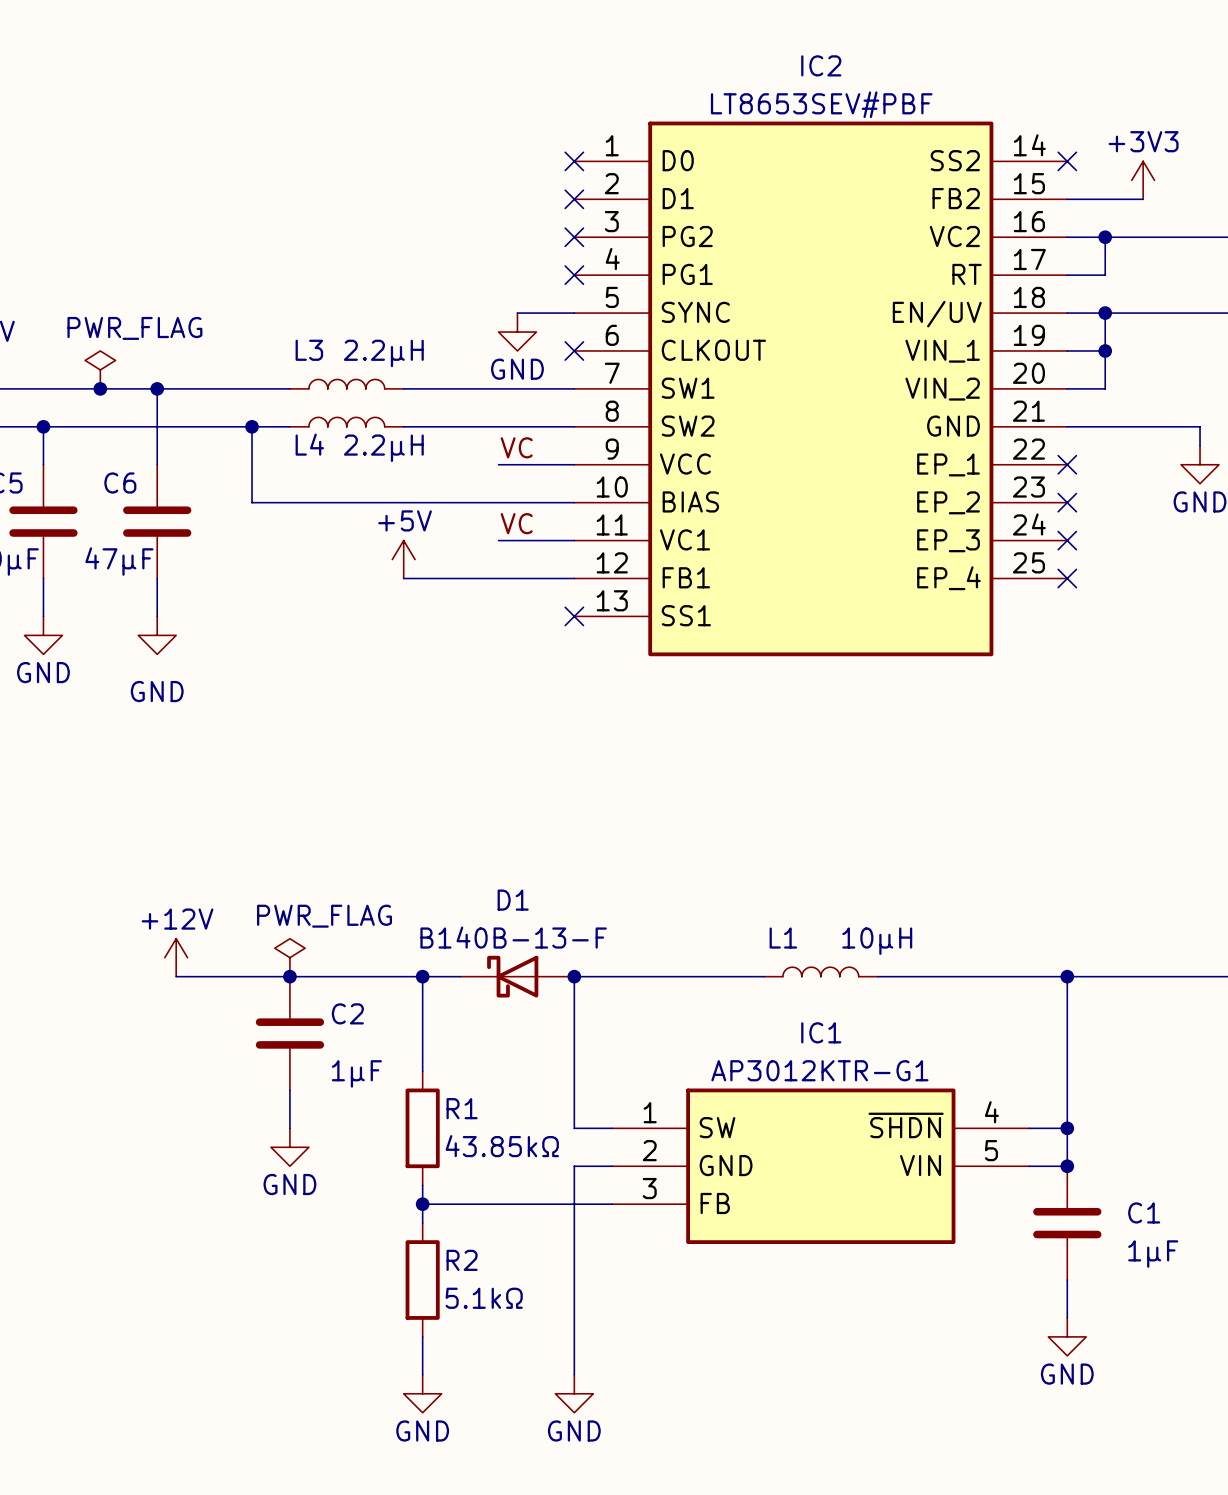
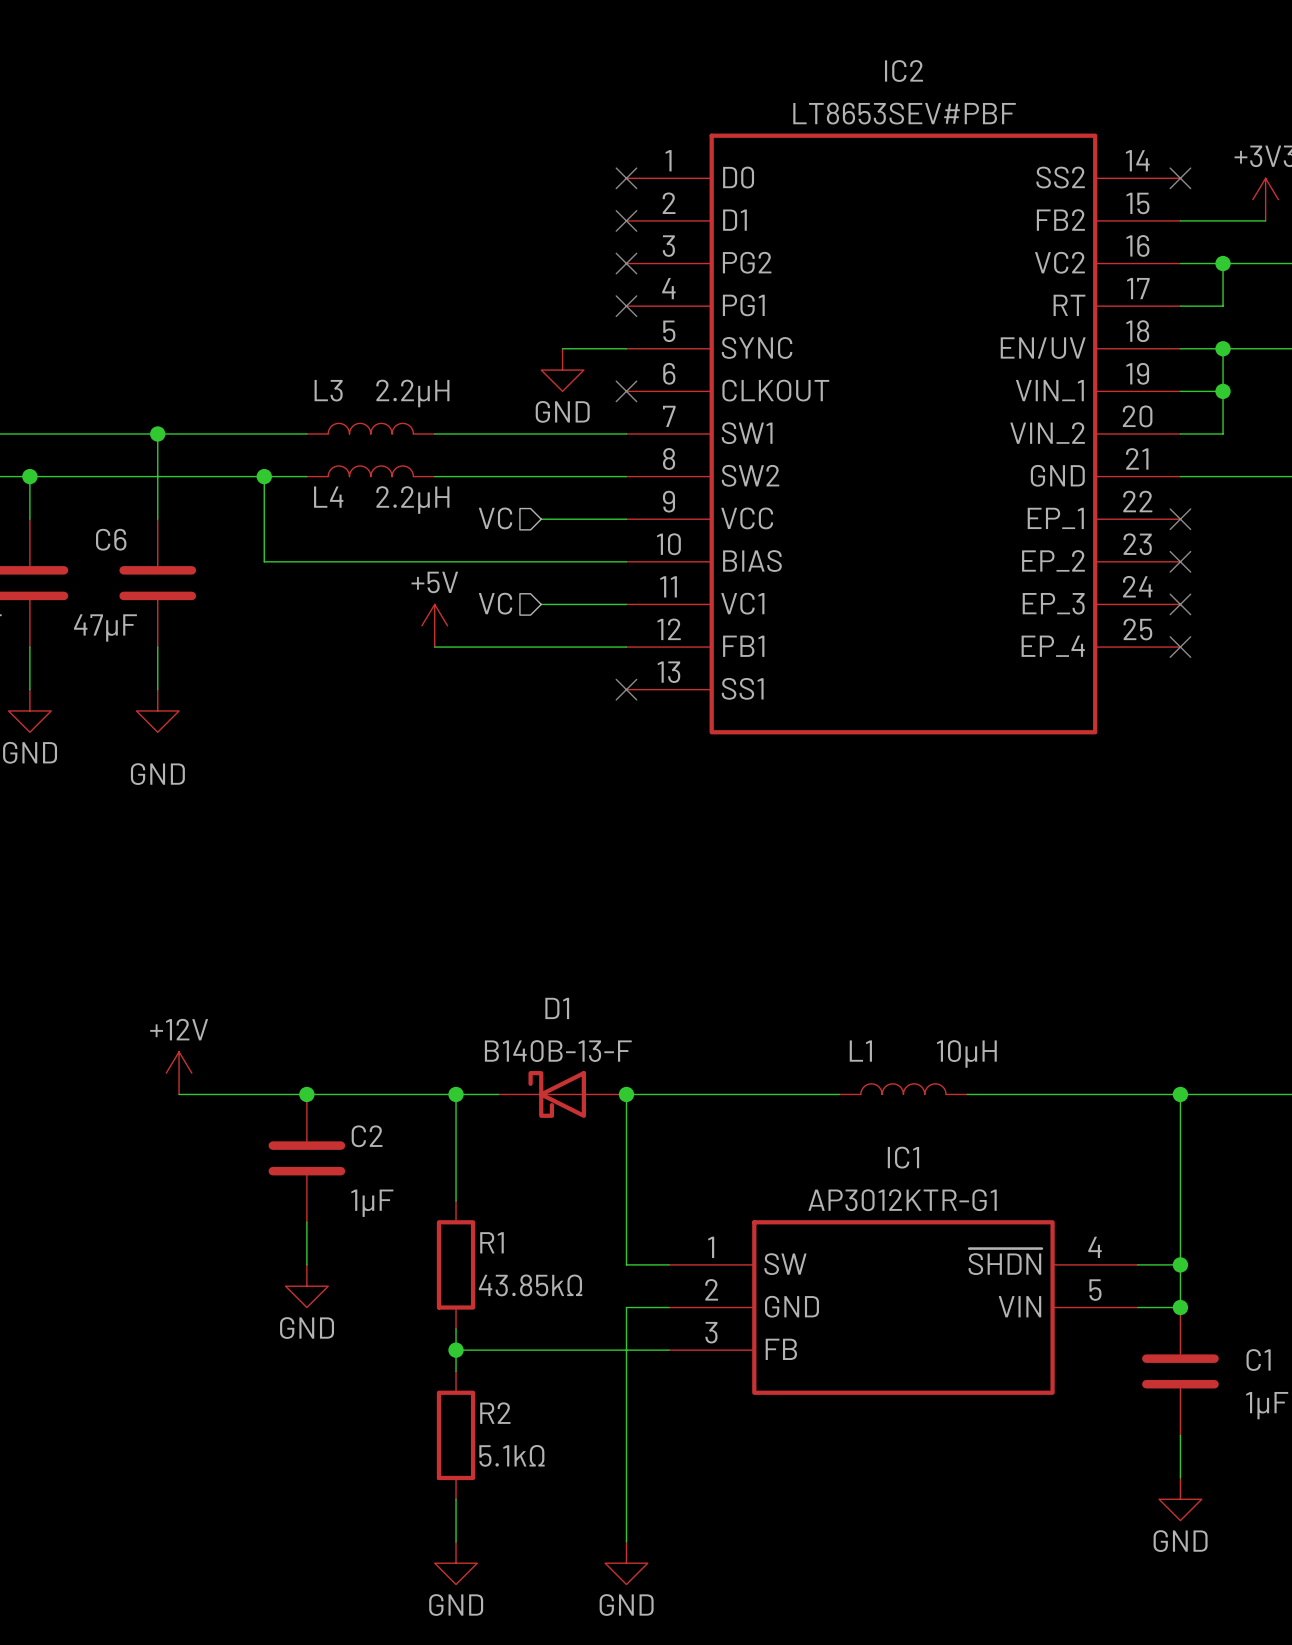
power symbol: PWR_FLAG (100, 369) -> none
junction: (100, 388) -> none
label: VC (516, 447) -> none
hierarchical label: none -> VC (495, 518)
label: VC (516, 523) -> none
hierarchical label: none -> VC (495, 603)
power symbol: PWR_FLAG (289, 957) -> none

